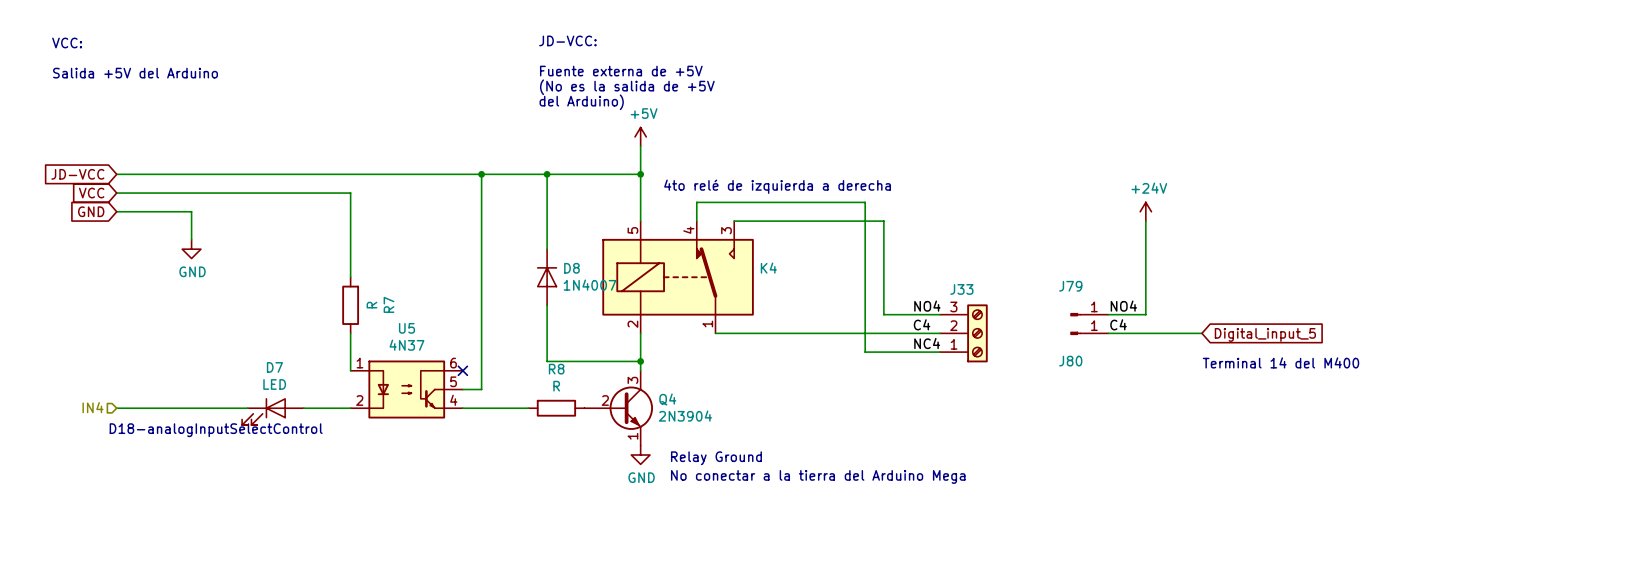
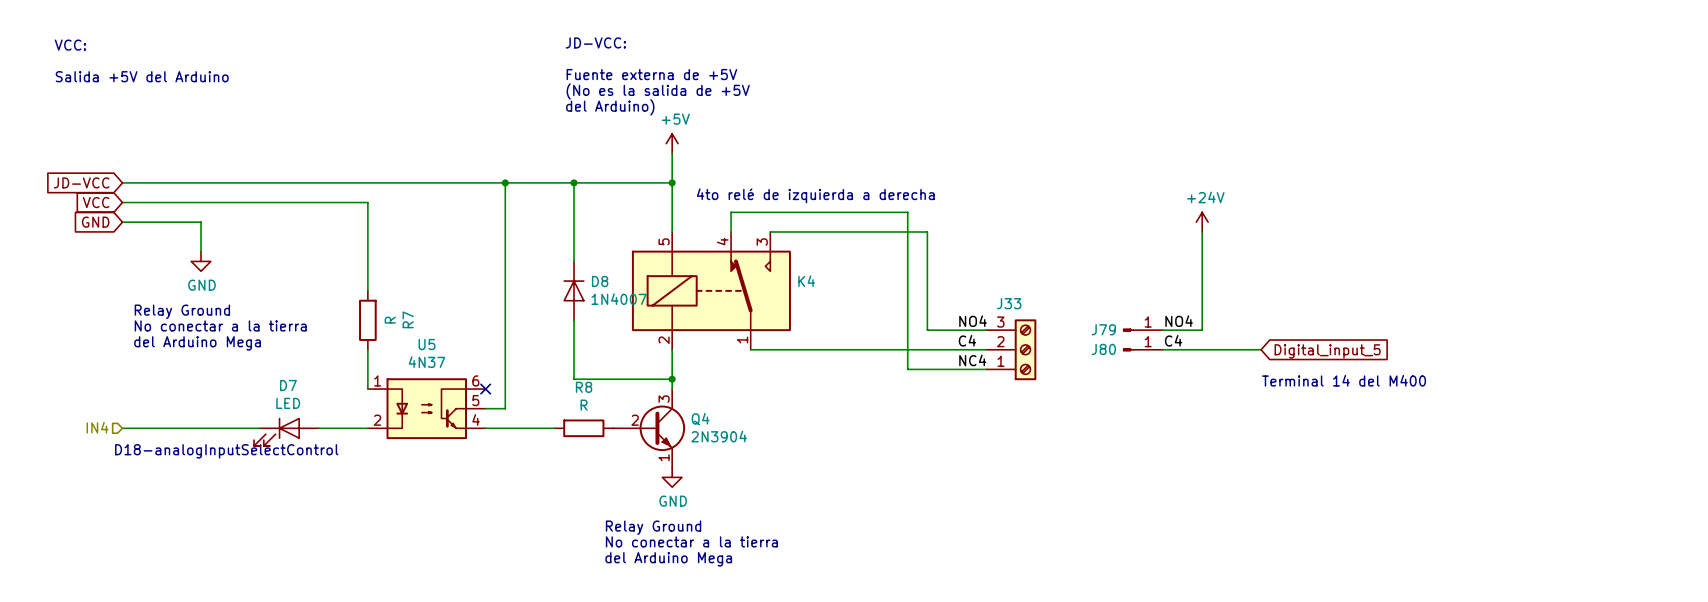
J79 name position: J79 (1070, 286) -> J79 (1103, 329)
text: none -> Relay Ground (182, 311)
text: none -> No conectar a la tierra (220, 325)
text: none -> del Arduino Mega (197, 343)
J80 name position: J80 (1070, 361) -> J80 (1103, 349)
text position: Relay Ground (716, 458) -> Relay Ground (653, 527)
text: No conectar a la tierra del Arduino Mega (818, 476) -> none
text: none -> No conectar a la tierra (691, 541)
text: none -> del Arduino Mega (668, 559)

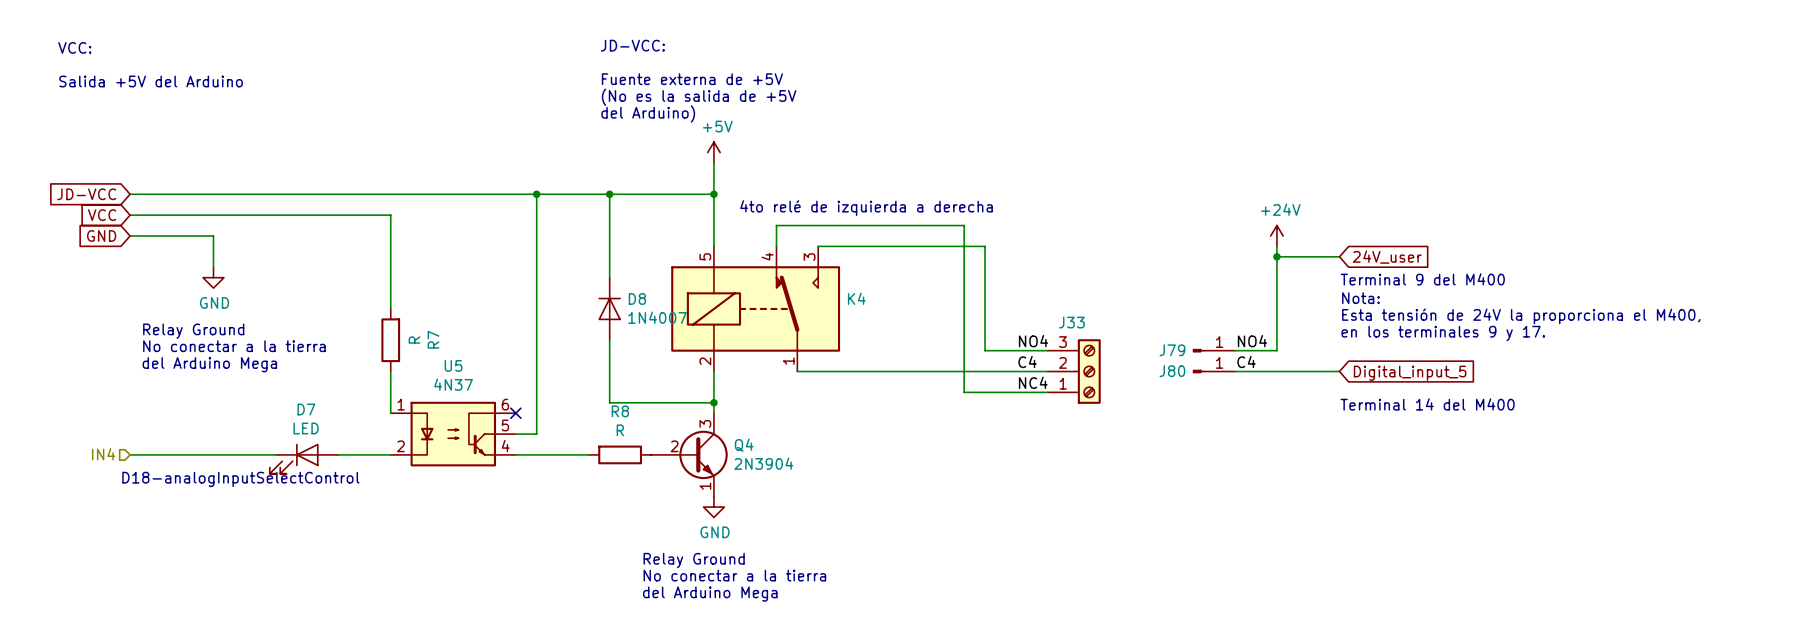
wire: none -> (1276, 256) (1339, 256)
junction: none -> (1276, 256)
global label: none -> 24V_user (1387, 257)
text: none -> Terminal 9 del M400 (1422, 279)
text: none -> Nota: (1360, 298)
text: none -> Esta tensión de 24V la proporciona el M400, (1521, 316)
text: none -> en los terminales 9 y 17. (1443, 333)

